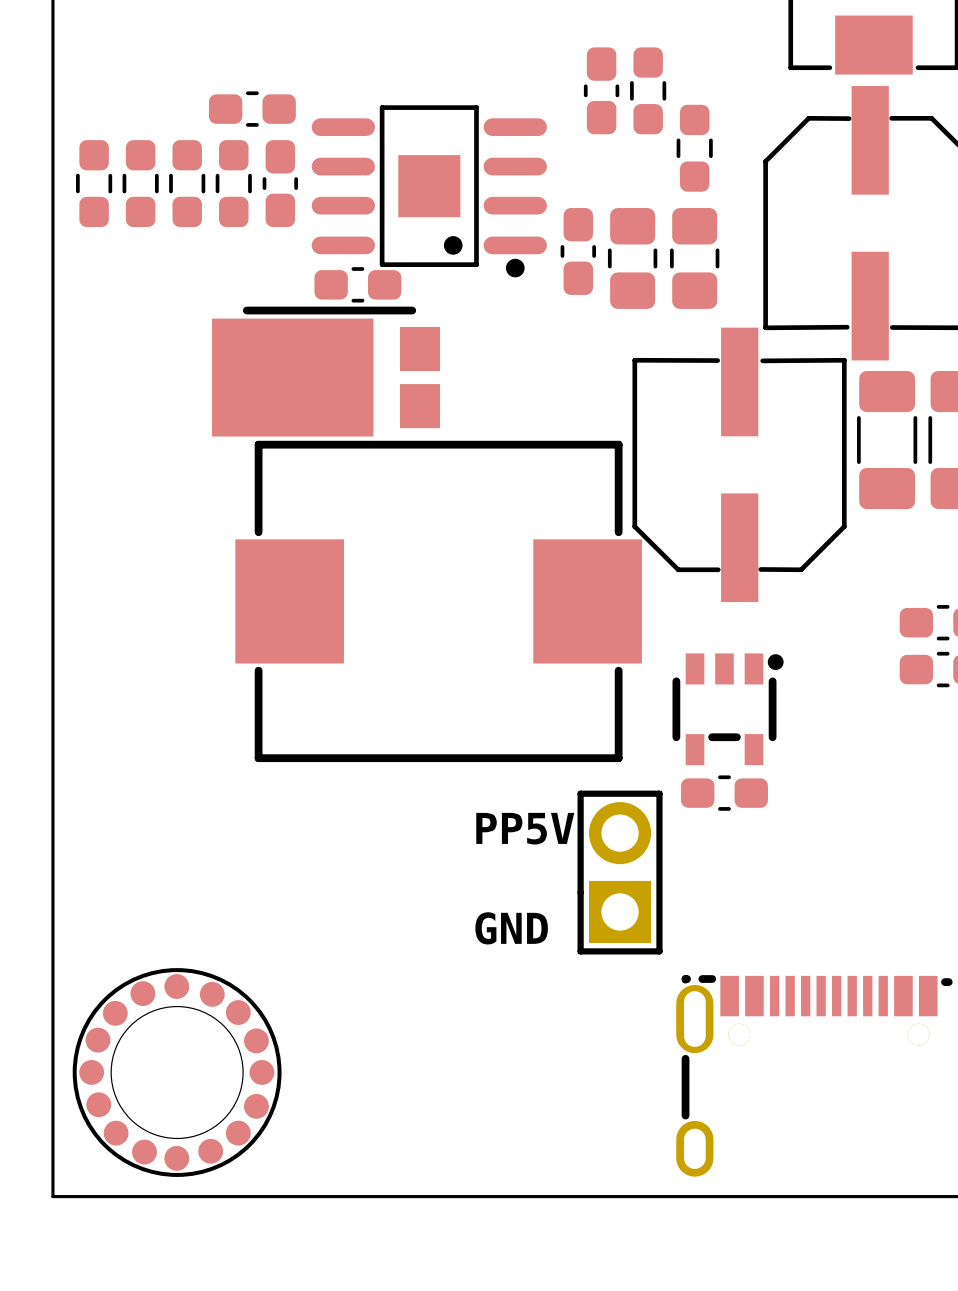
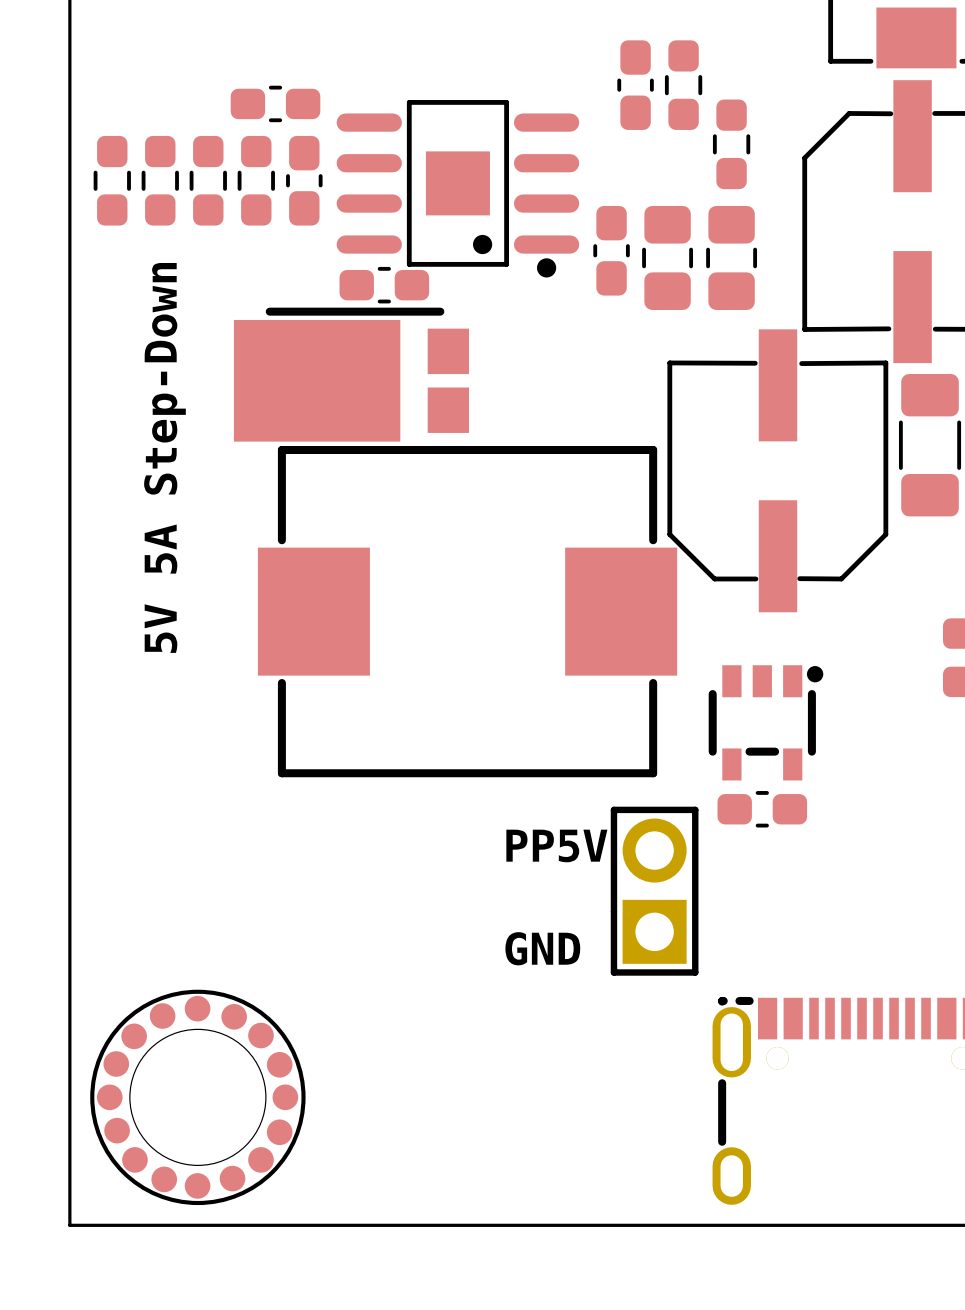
text: none -> 5V 5A Step-Down (164, 457)

